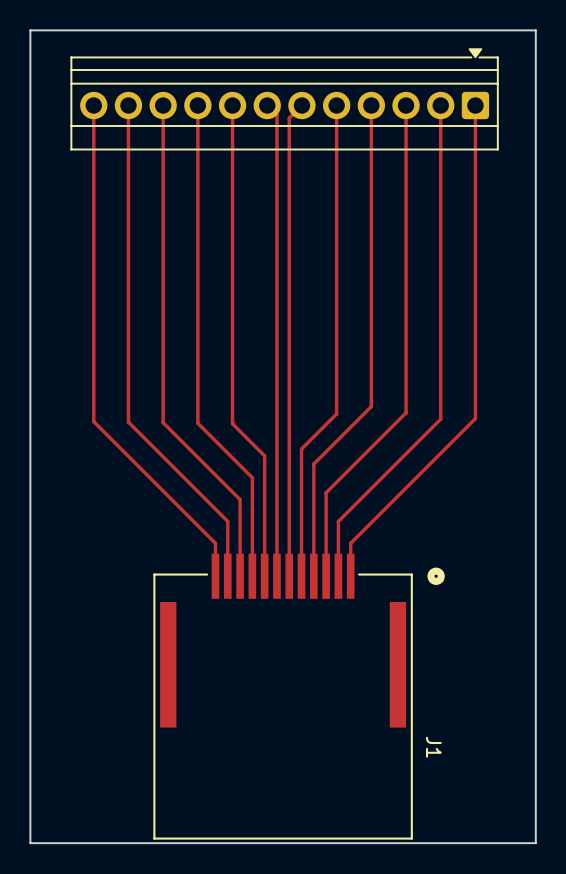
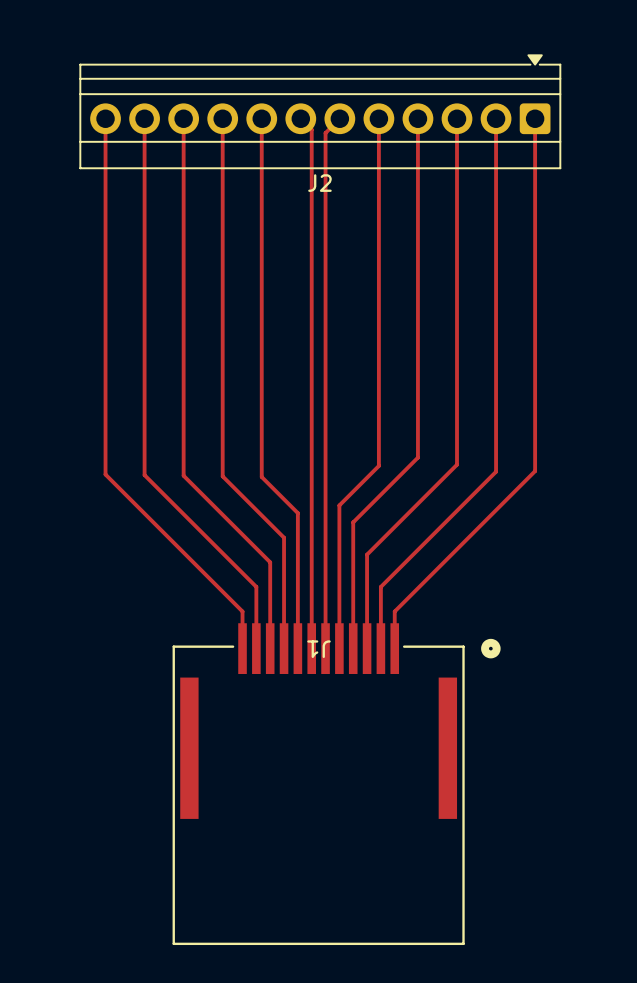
board edge: (30, 30) (535, 30) (535, 843) (30, 843) (30, 30) -> none
J2 name: none -> J2 (319, 183)
J1 name rotation: 0° (433, 747) -> 90° clockwise (319, 649)
J1 name position: J1 (433, 747) -> J1 (319, 649)

